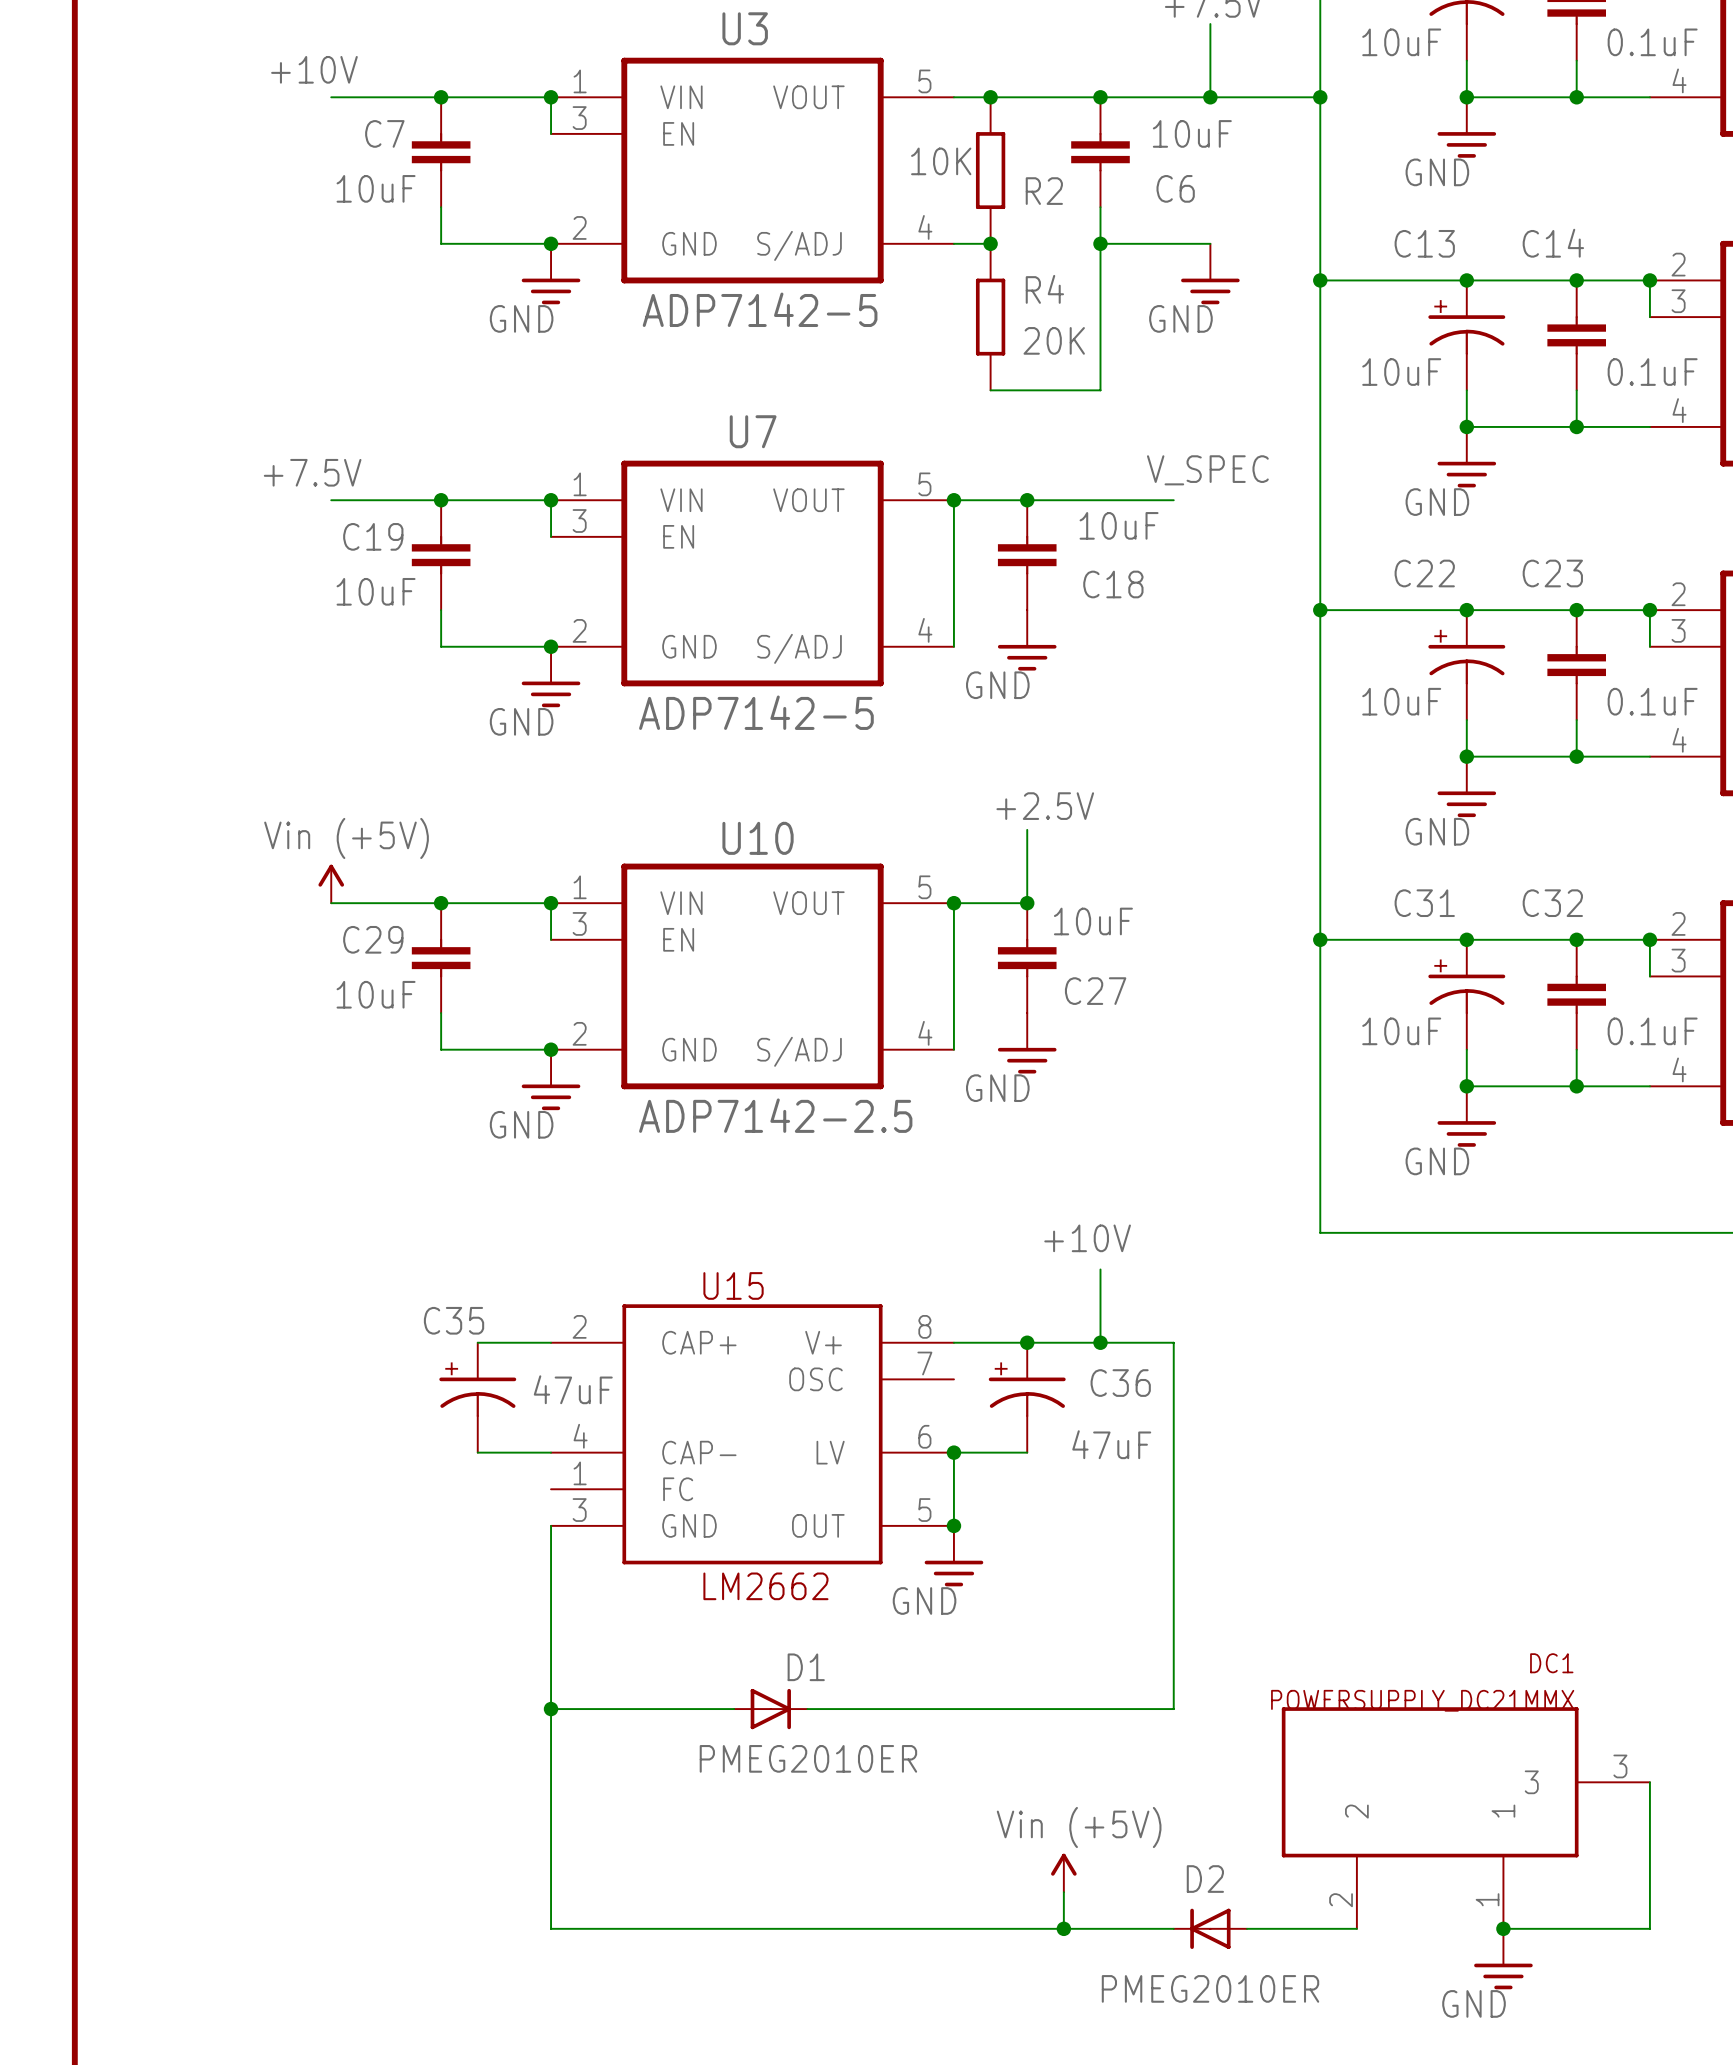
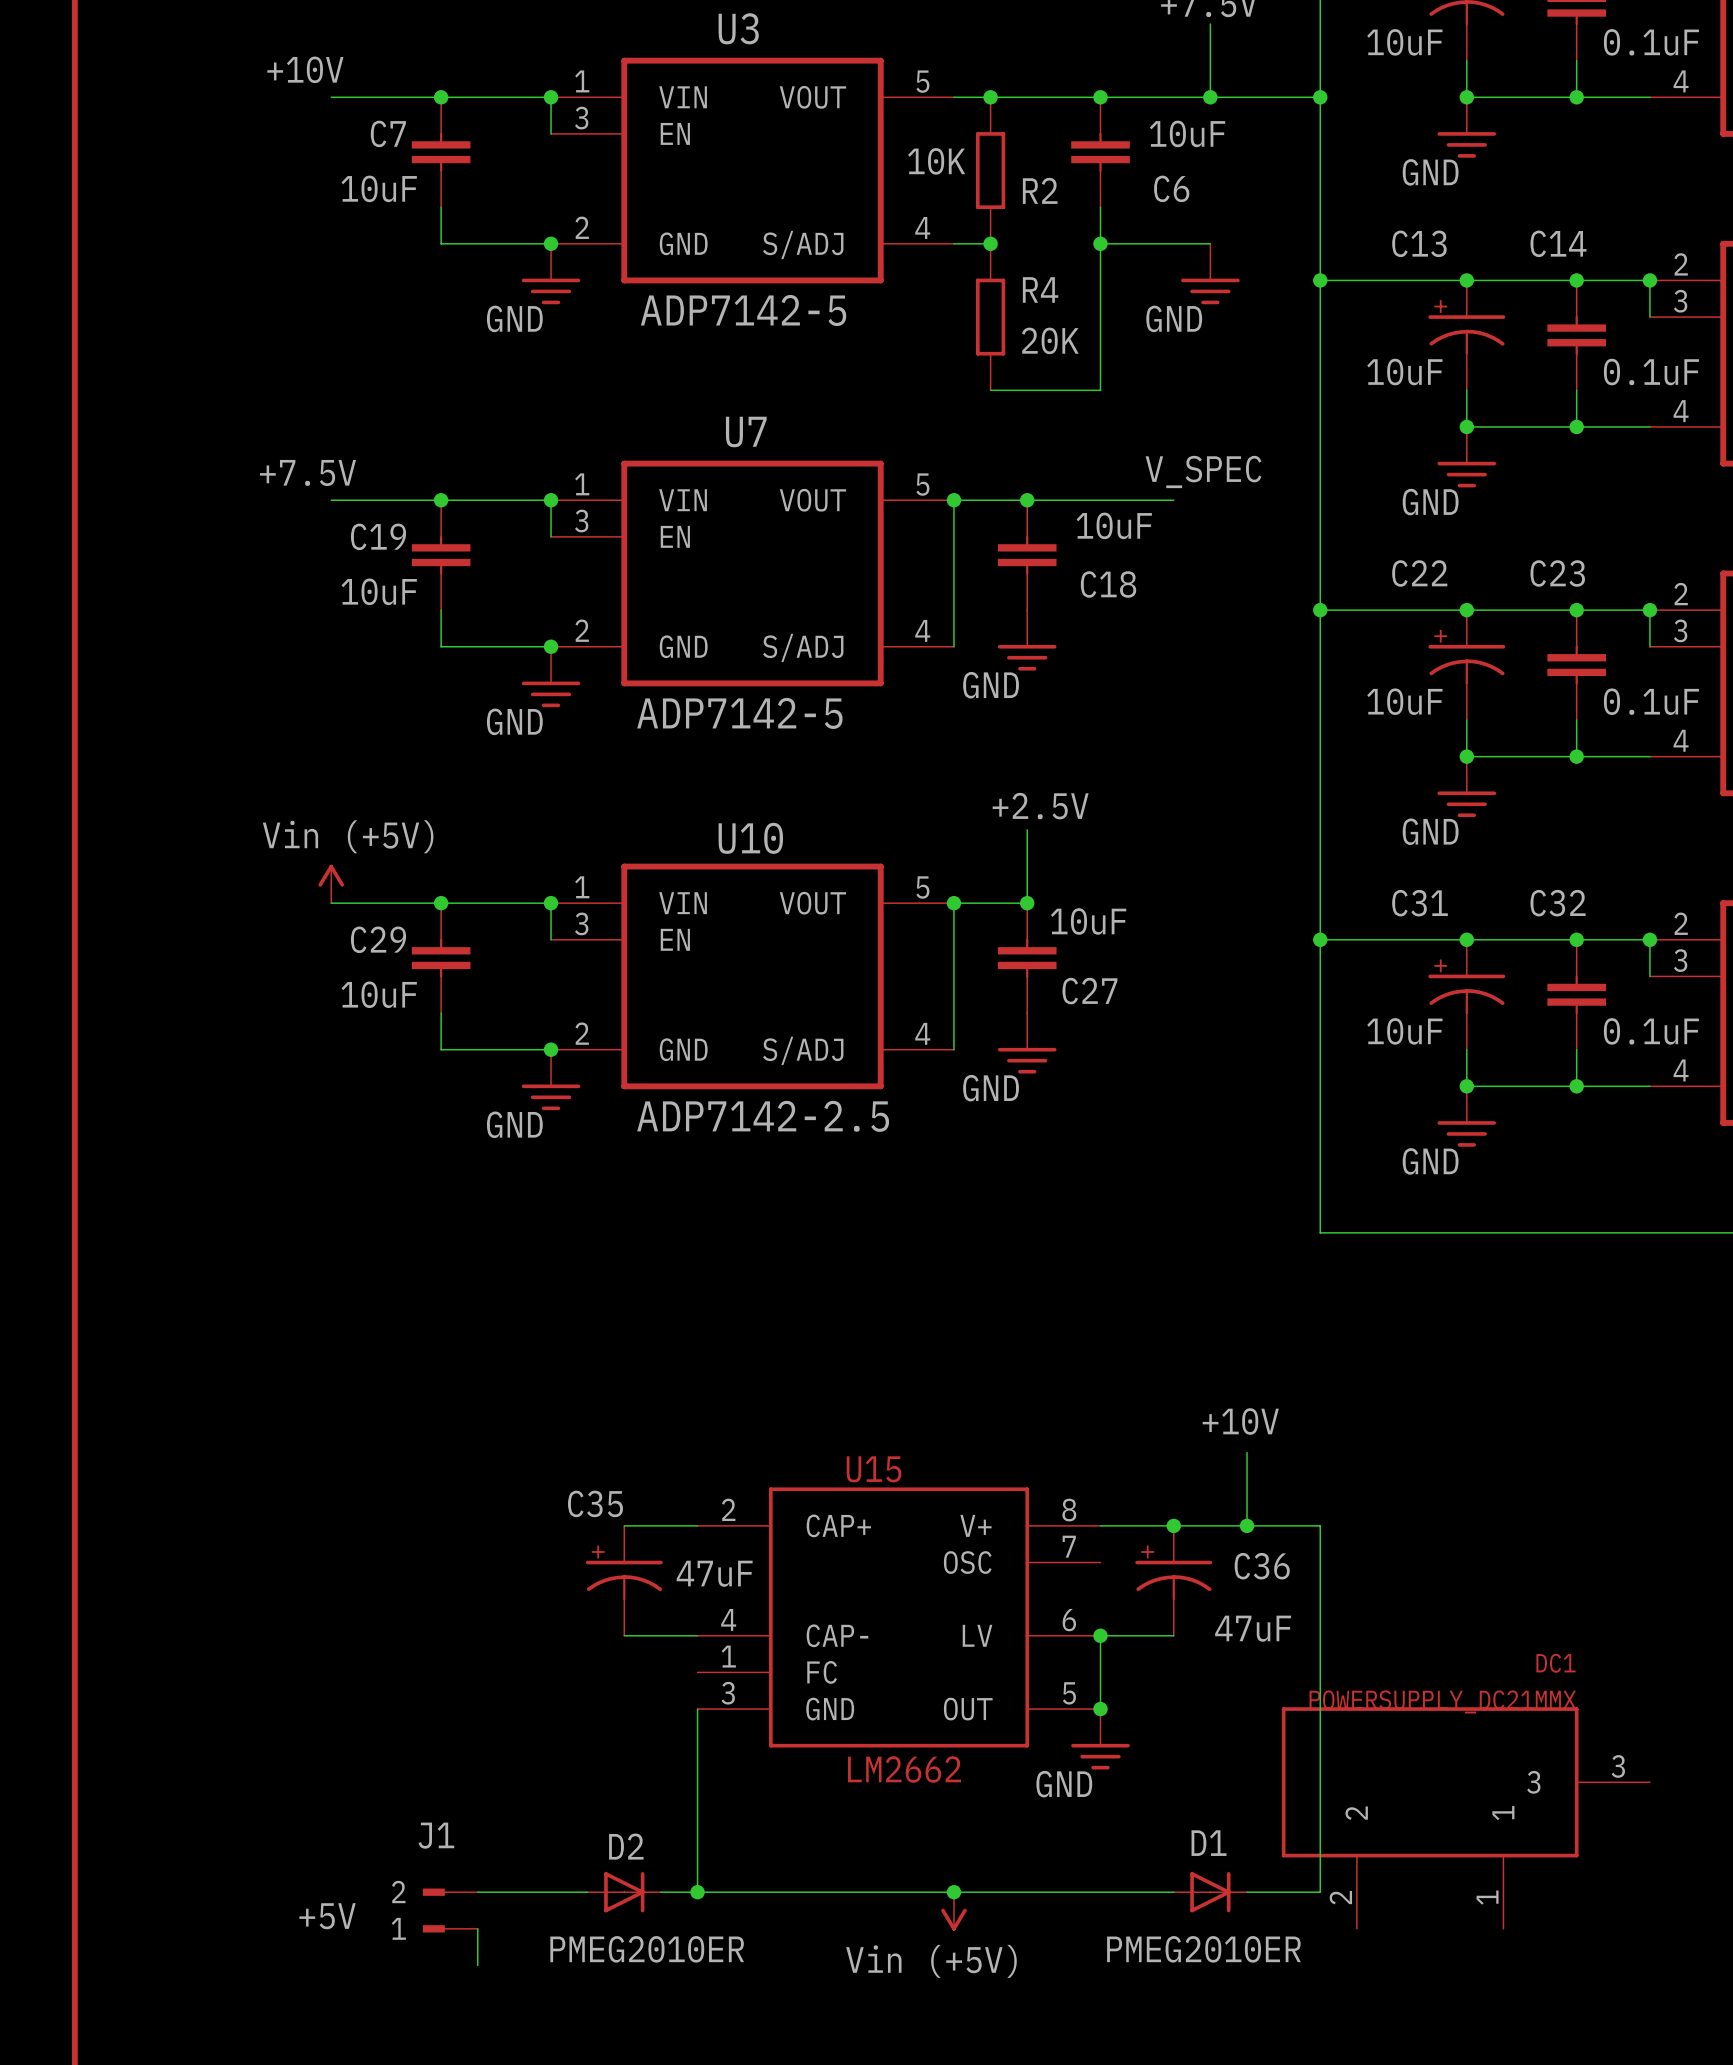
label position: +10V (1087, 1238) -> +10V (1240, 1421)
wire: (1100, 1269) (1100, 1342) -> (1247, 1452) (1247, 1525)
wire: (477, 1342) (551, 1342) -> (624, 1525) (697, 1525)
wire: (953, 1342) (1173, 1342) (1173, 1709) (807, 1709) -> none
junction: (1027, 1342) -> none
junction: (1100, 1342) -> none
C35 position: (477, 1397) -> (624, 1580)
C36 position: (1027, 1397) -> (1173, 1580)
U15 position: (752, 1434) -> (899, 1617)
wire: (477, 1452) (551, 1452) -> (624, 1635) (697, 1635)
junction: (953, 1452) -> none
wire: (1027, 1452) (953, 1452) (953, 1525) -> (1173, 1635) (1100, 1635) (1100, 1709)
wire: (551, 1525) (551, 1928) (1173, 1928) -> none
junction: (953, 1525) -> none
wire: none -> (1100, 1525) (1320, 1525) (1320, 1892) (1247, 1892)
junction: none -> (1173, 1525)
junction: none -> (1247, 1525)
power symbol: GND (953, 1556) -> none
junction: none -> (1100, 1635)
D1 name position: D1 (806, 1667) -> D1 (1209, 1843)
wire: (551, 1709) (734, 1709) -> none
junction: (551, 1709) -> none
wire: none -> (697, 1709) (697, 1892)
D1 position: (770, 1709) -> (1210, 1892)
junction: none -> (1100, 1709)
power symbol: none -> GND (1100, 1739)
D1 value position: PMEG2010ER (808, 1758) -> PMEG2010ER (1203, 1949)
wire: (1649, 1782) (1649, 1928) (1503, 1928) -> none
power symbol: (1063, 1872) -> none
wire: none -> (477, 1892) (587, 1892)
wire: none -> (660, 1892) (1173, 1892)
junction: none -> (697, 1892)
junction: none -> (953, 1892)
wire: (1063, 1892) (1063, 1928) -> none
J1: none -> +5V (450, 1910)
power symbol: none -> (953, 1911)
wire: none -> (477, 1928) (477, 1965)
junction: (1063, 1928) -> none
D2 rotation: 0° (1210, 1928) -> 180° (624, 1892)
D2 position: (1210, 1928) -> (624, 1892)
wire: (1247, 1928) (1356, 1928) -> none
junction: (1503, 1928) -> none
power symbol: GND (1503, 1959) -> none
D2 value position: PMEG2010ER (1210, 1988) -> PMEG2010ER (647, 1949)

